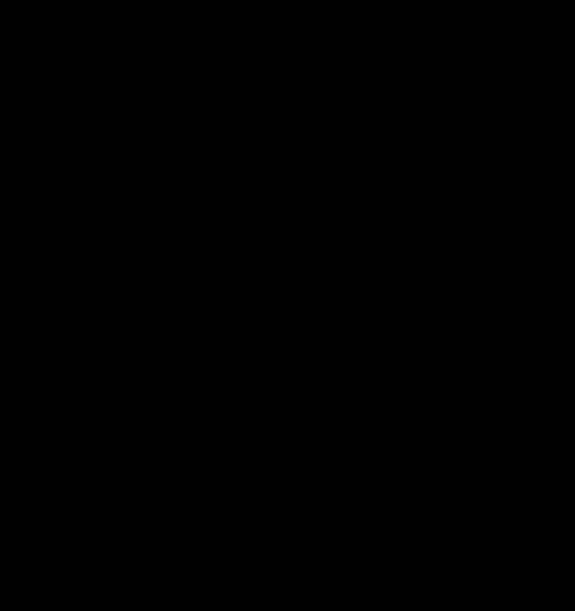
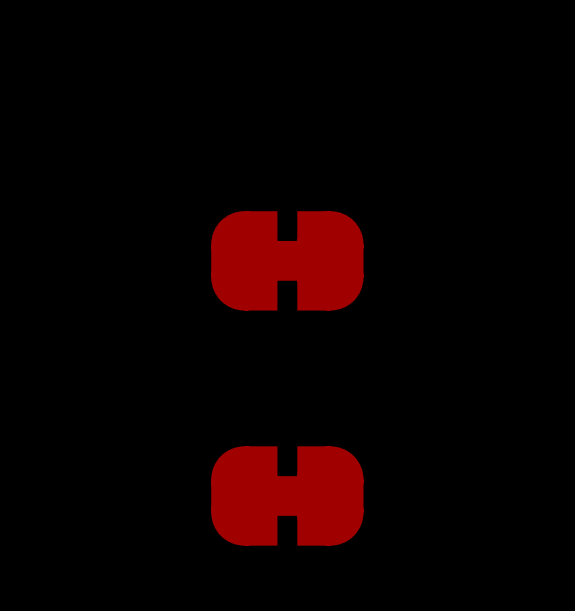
part: none -> (287, 260)
part: none -> (287, 495)

